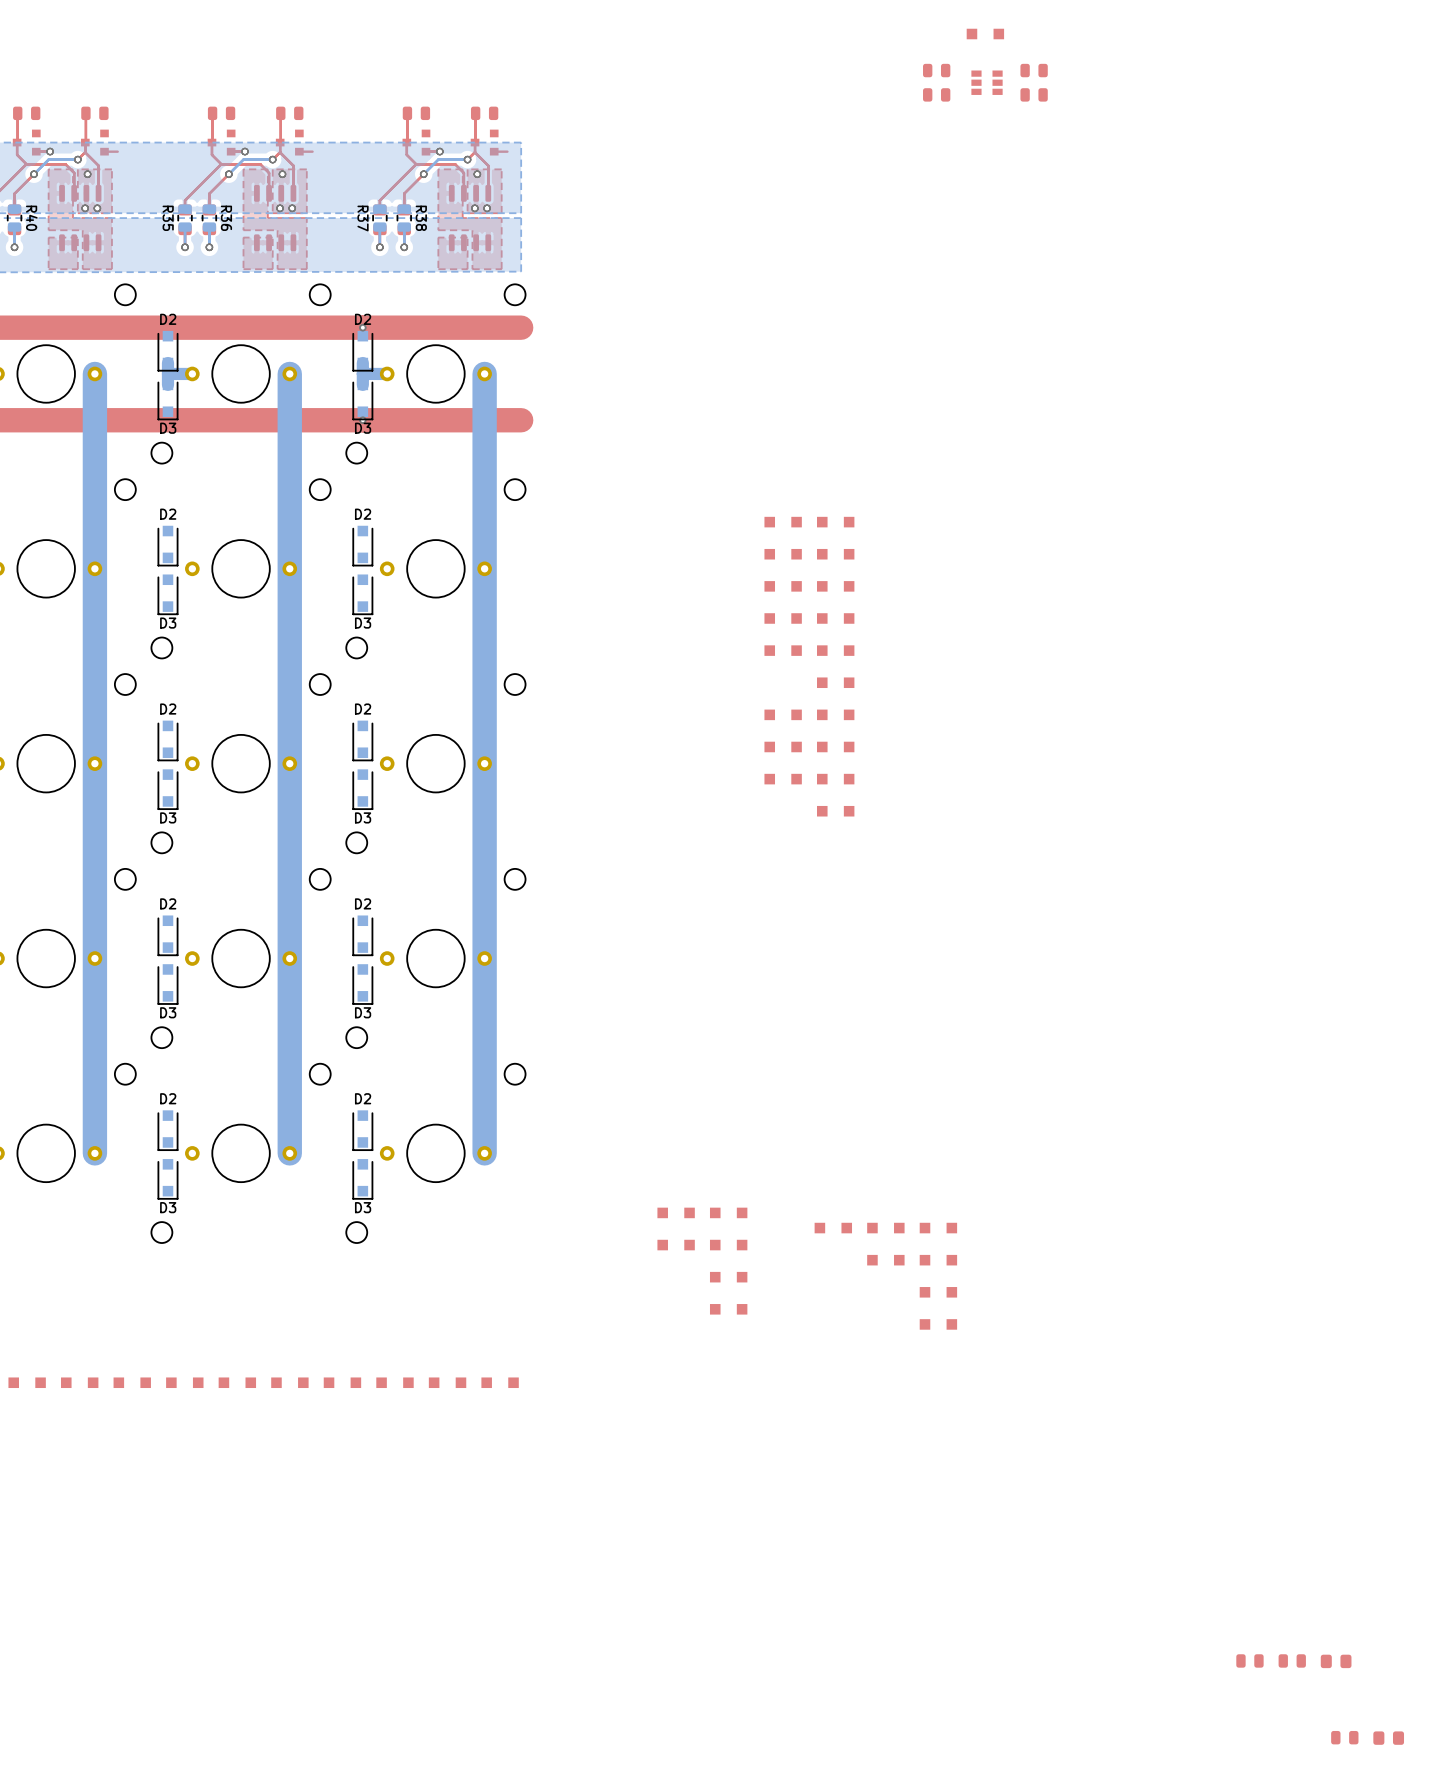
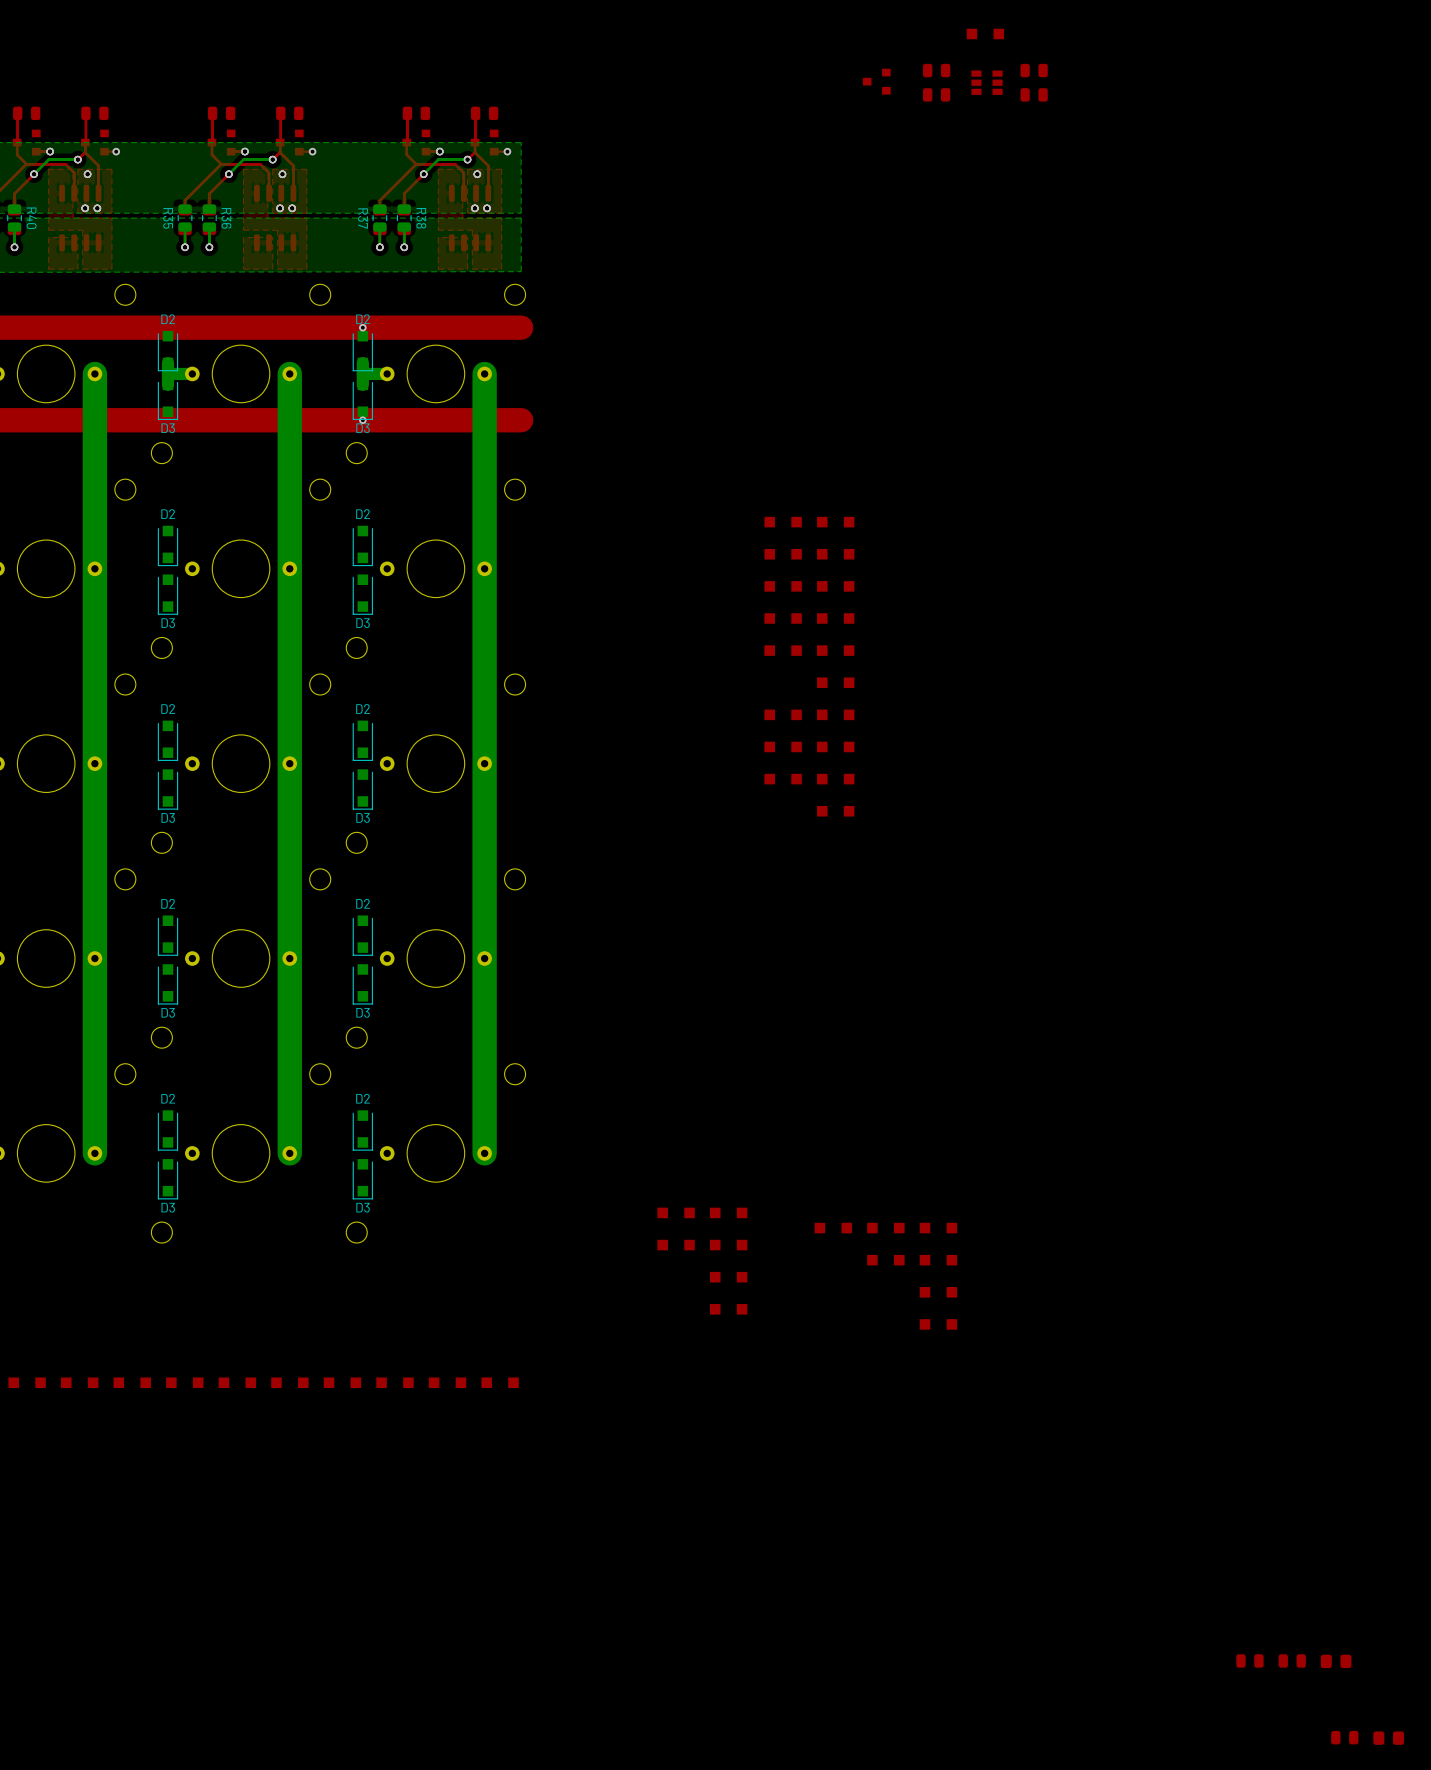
part: none -> (876, 81)
via: none -> (116, 151)
via: none -> (312, 151)
via: none -> (507, 151)

